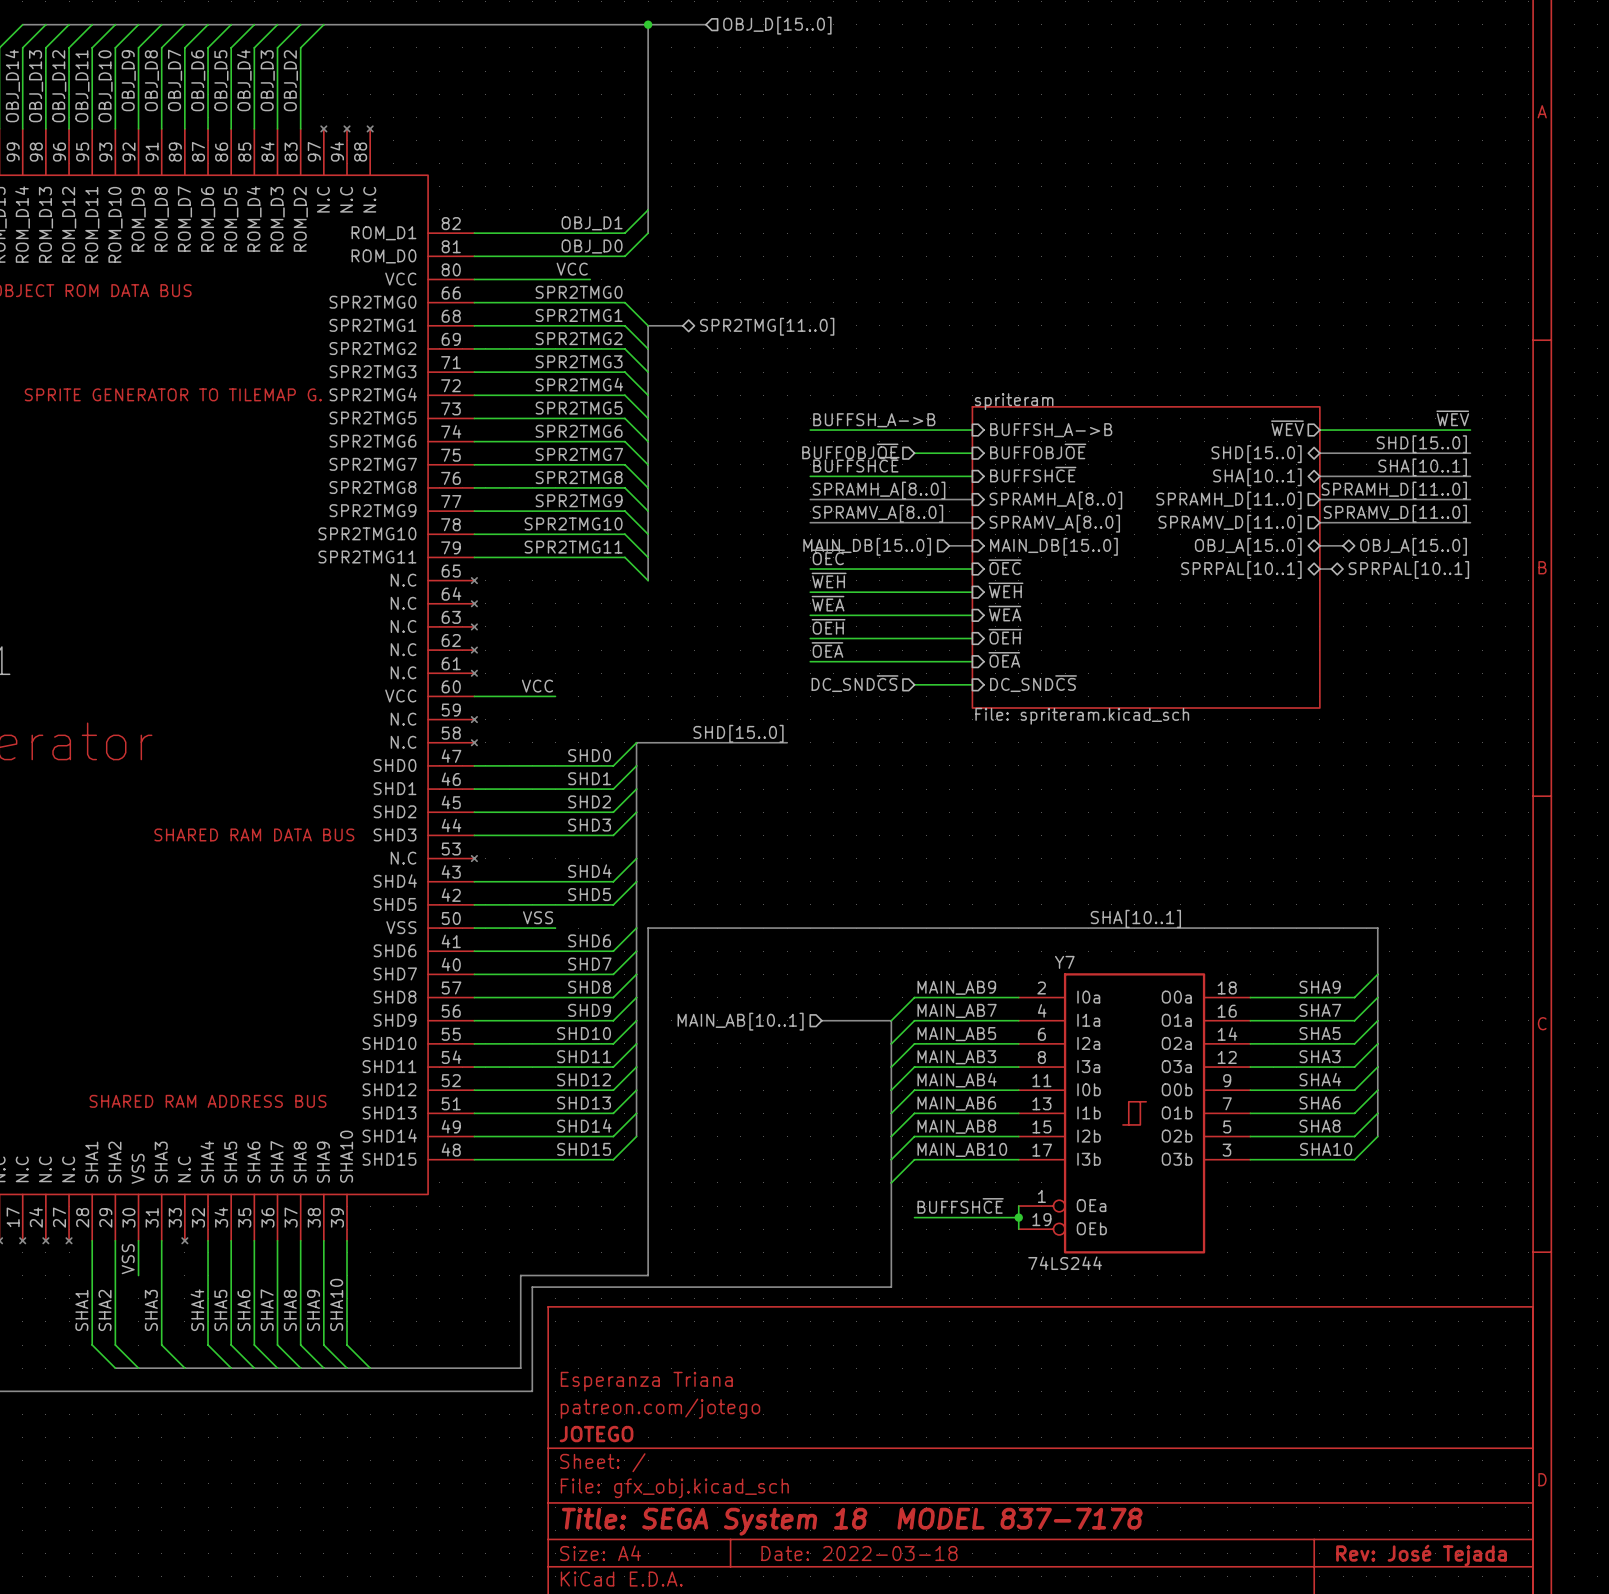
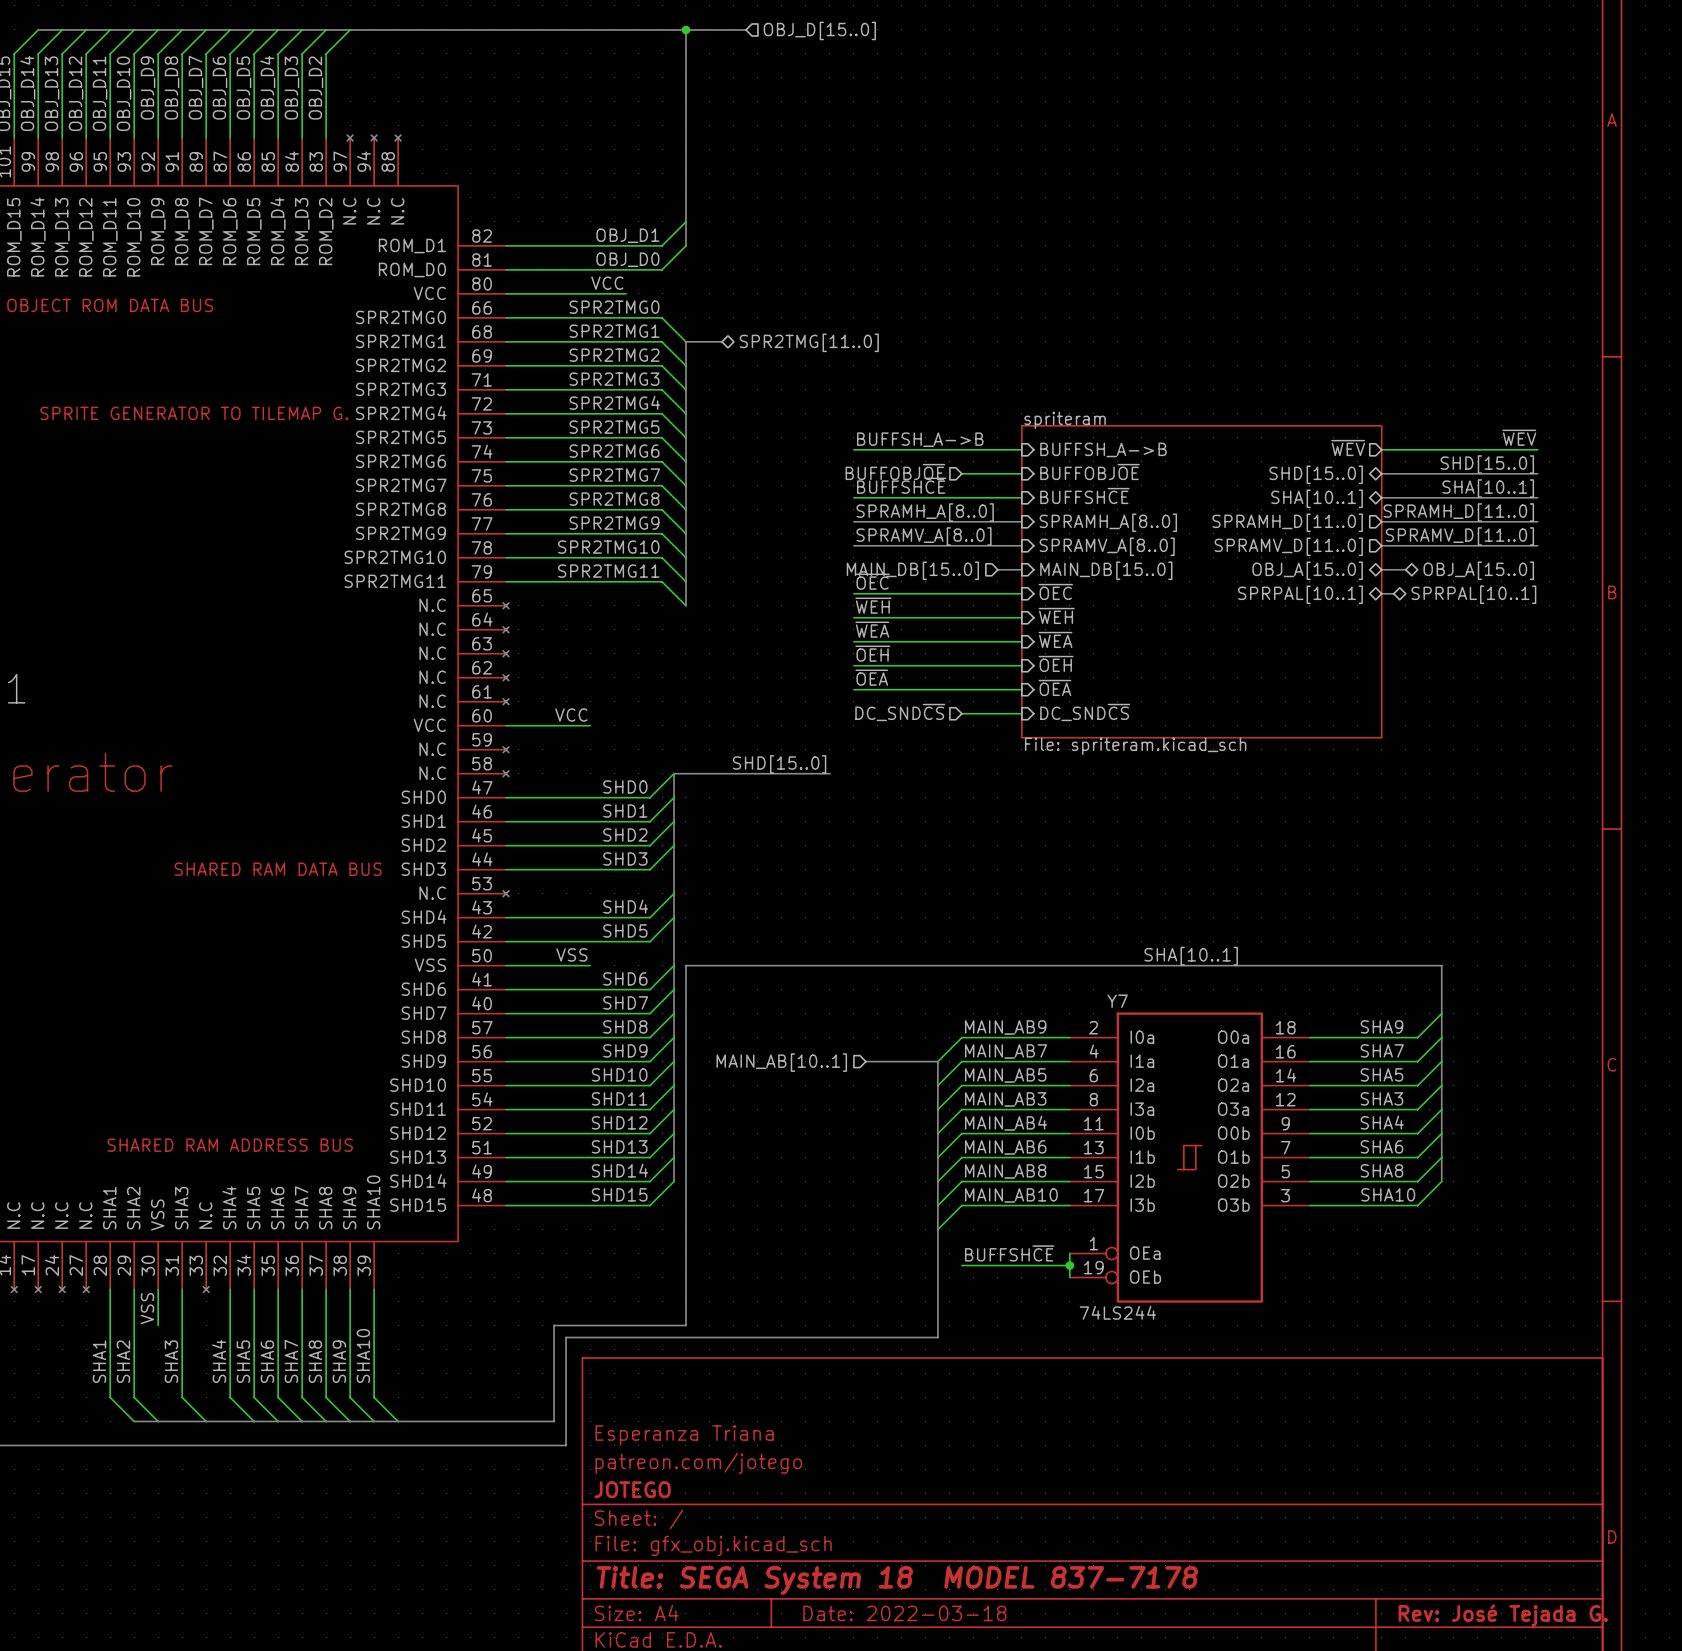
title block: Rev: José Tejada (1421, 1555) -> Rev: José Tejada G. (1503, 1615)

